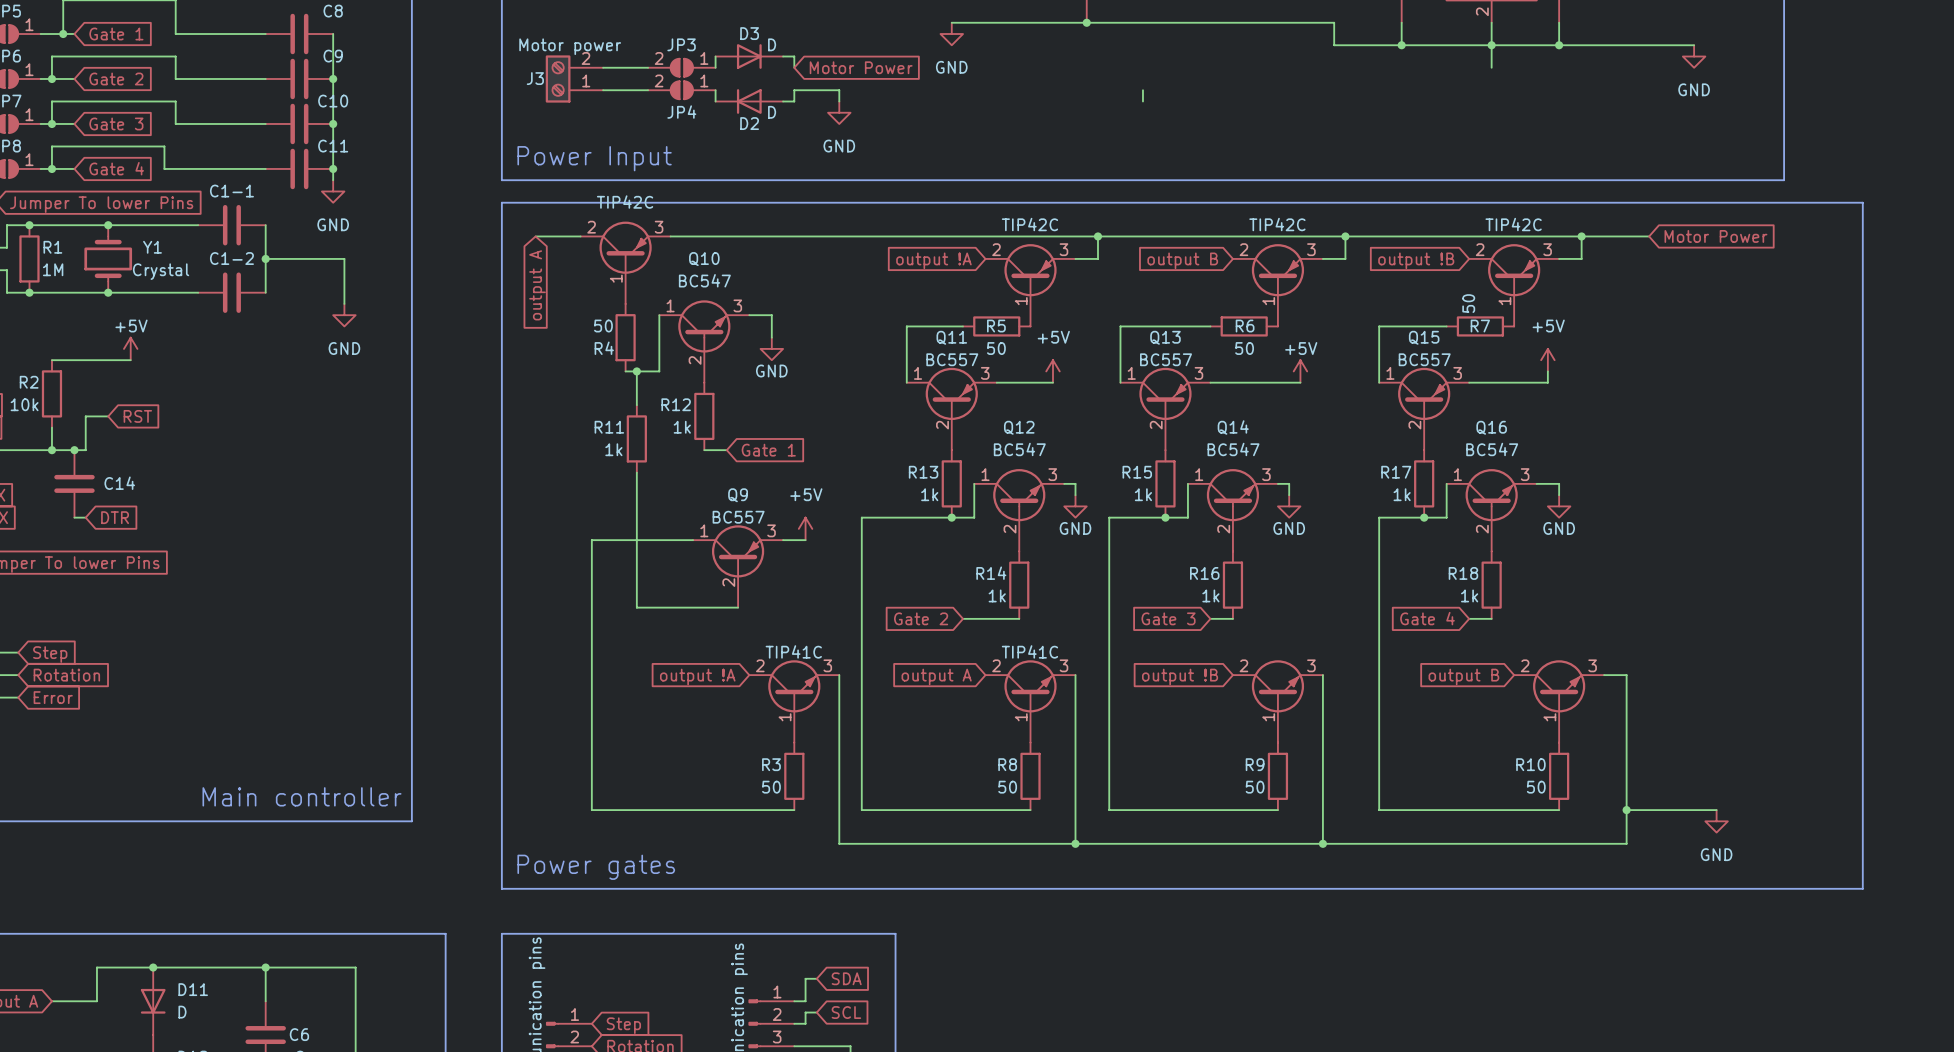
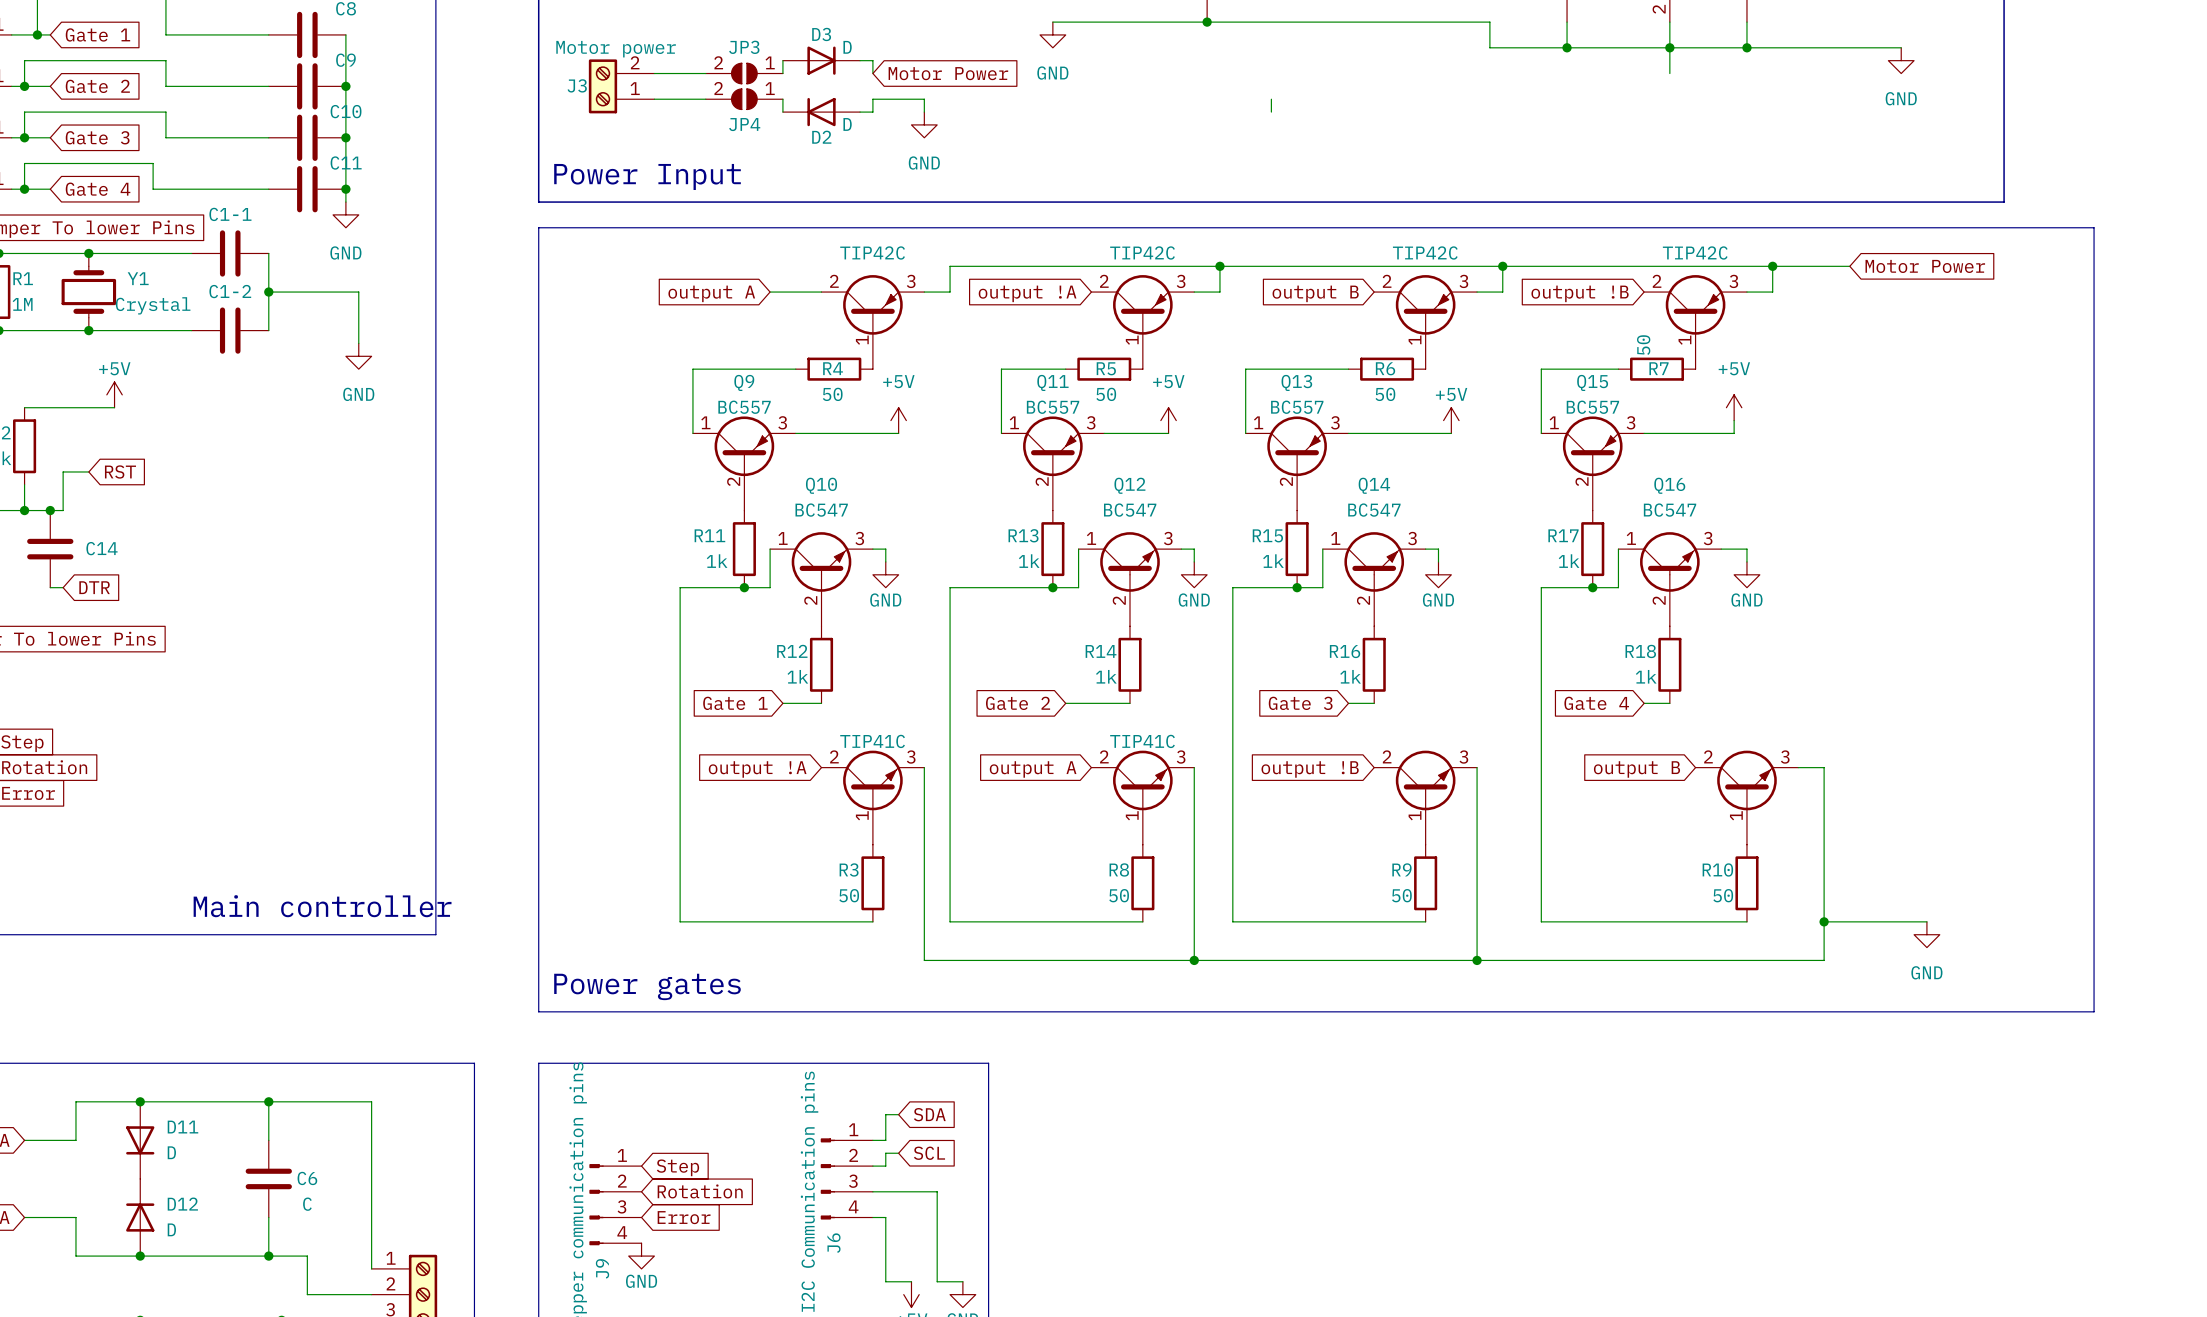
wire: (535, 236) (580, 236) -> (770, 292) (821, 292)
wire: (670, 236) (861, 236) -> (924, 292) (950, 292) (950, 266)
part position: (625, 262) -> (872, 322)
global label rotation: 0° (537, 285) -> 90° clockwise (711, 293)
global label position: output A (537, 285) -> output A (711, 293)
wire: (659, 315) (659, 371) (625, 371) -> none
wire: (749, 315) (771, 315) (771, 337) -> none
R4 value position: 50 (603, 326) -> 50 (832, 394)
wire: none -> (795, 369) (692, 369) (692, 420)
R4 rotation: 0° (625, 337) -> 90° clockwise (834, 369)
R4 position: (625, 337) -> (834, 369)
Q10 position: (704, 341) -> (821, 579)
R4 name position: R4 (604, 348) -> R4 (833, 368)
power symbol position: GND (771, 348) -> GND (885, 574)
junction: (636, 371) -> none
wire: (636, 382) (636, 405) -> none
wire: none -> (795, 433) (898, 433)
R12 position: (704, 416) -> (821, 664)
R11 position: (636, 438) -> (744, 549)
wire: (704, 450) (726, 450) -> none
global label rotation: 0° (768, 450) -> 180° (735, 703)
global label position: Gate 1 (768, 450) -> Gate 1 (735, 703)
wire: (636, 472) (636, 607) (738, 607) -> none
wire: none -> (872, 549) (885, 549) (885, 561)
junction: none -> (744, 587)
power symbol position: +5V (805, 528) -> +5V (898, 420)
wire: (693, 540) (591, 540) (591, 810) (625, 810) -> (770, 549) (770, 587) (680, 587) (680, 921)
wire: (783, 540) (805, 540) -> none
Q9 position: (738, 566) -> (744, 463)
wire: none -> (782, 703) (821, 703)

